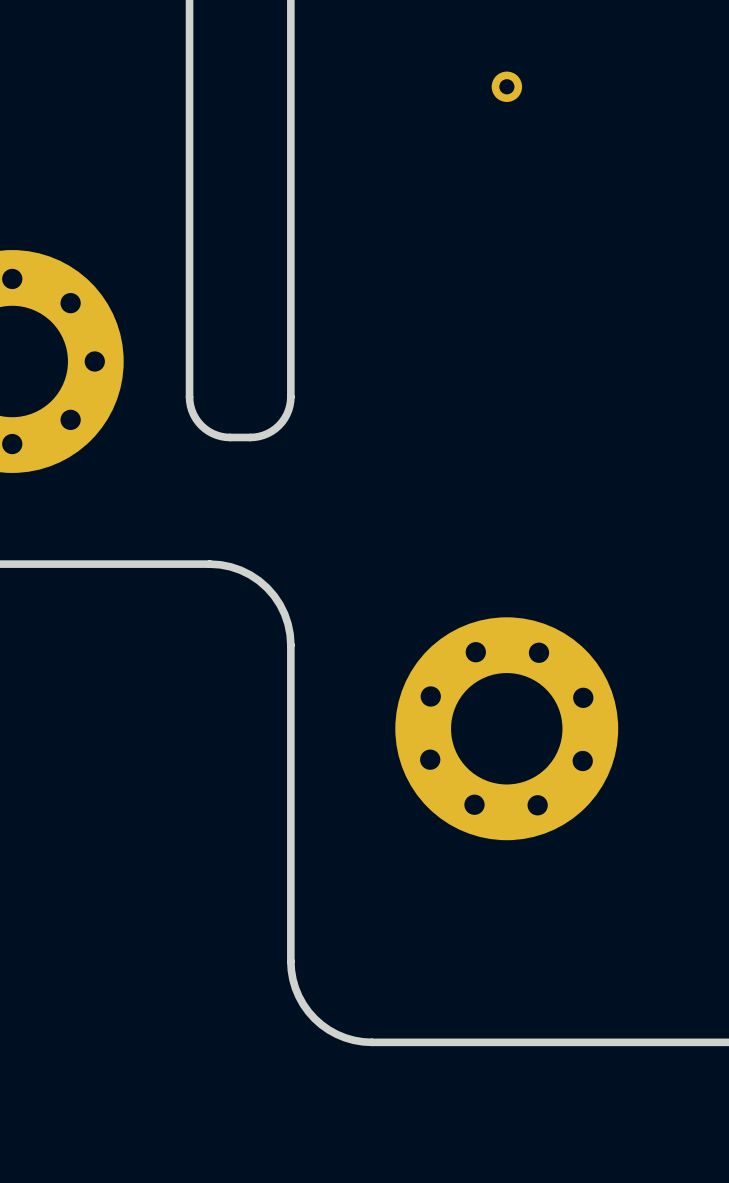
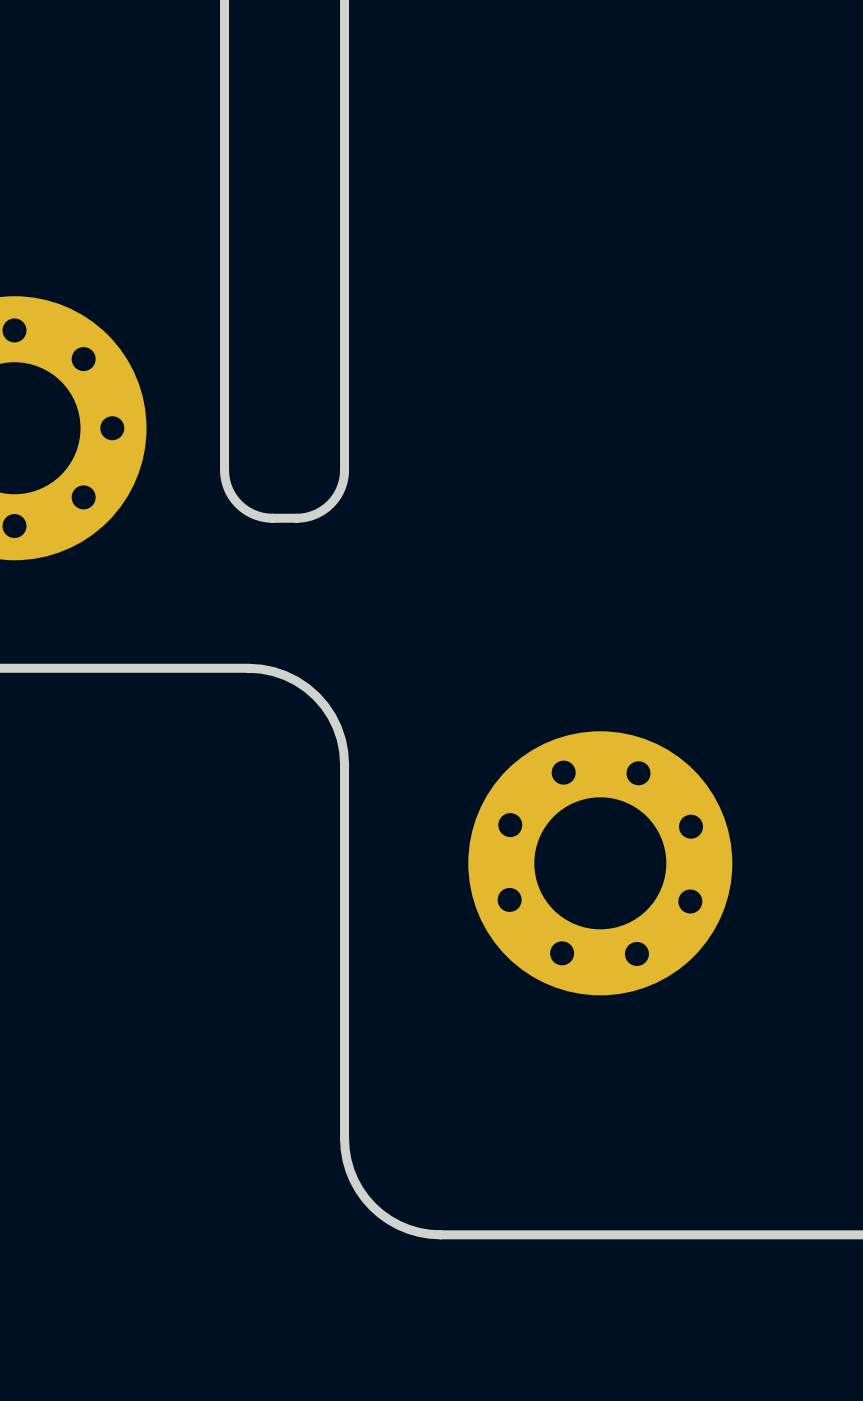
part: (506, 86) -> none

